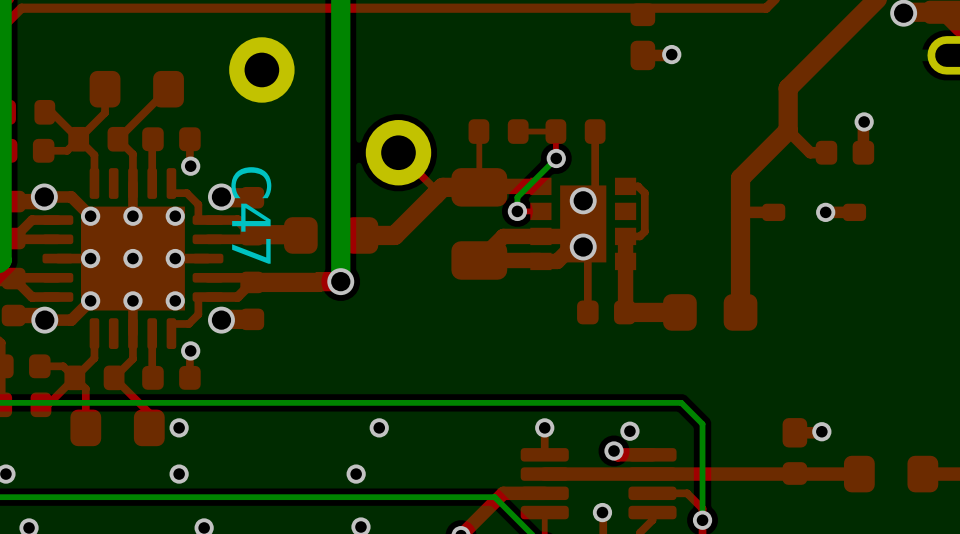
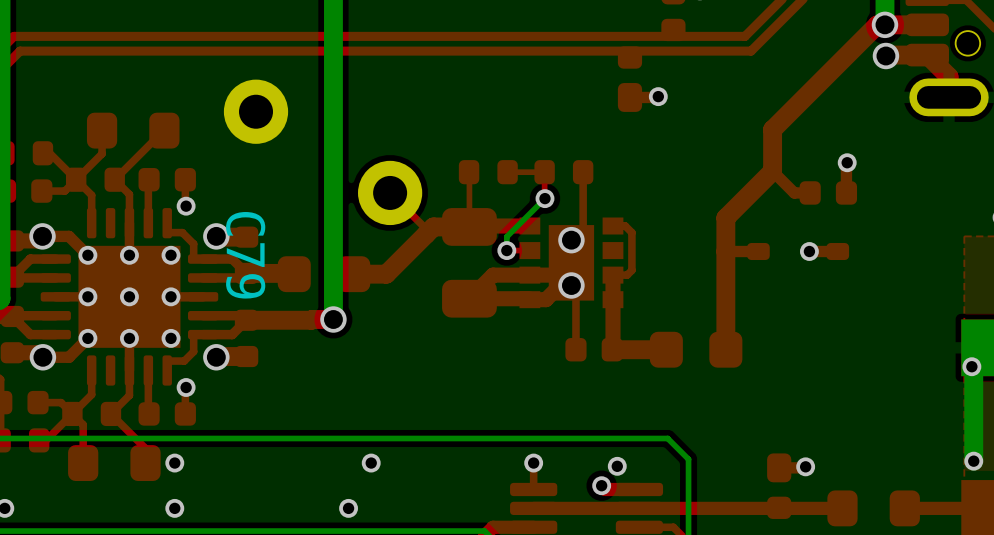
C47 name: C47 (251, 215) -> C79 (245, 255)

